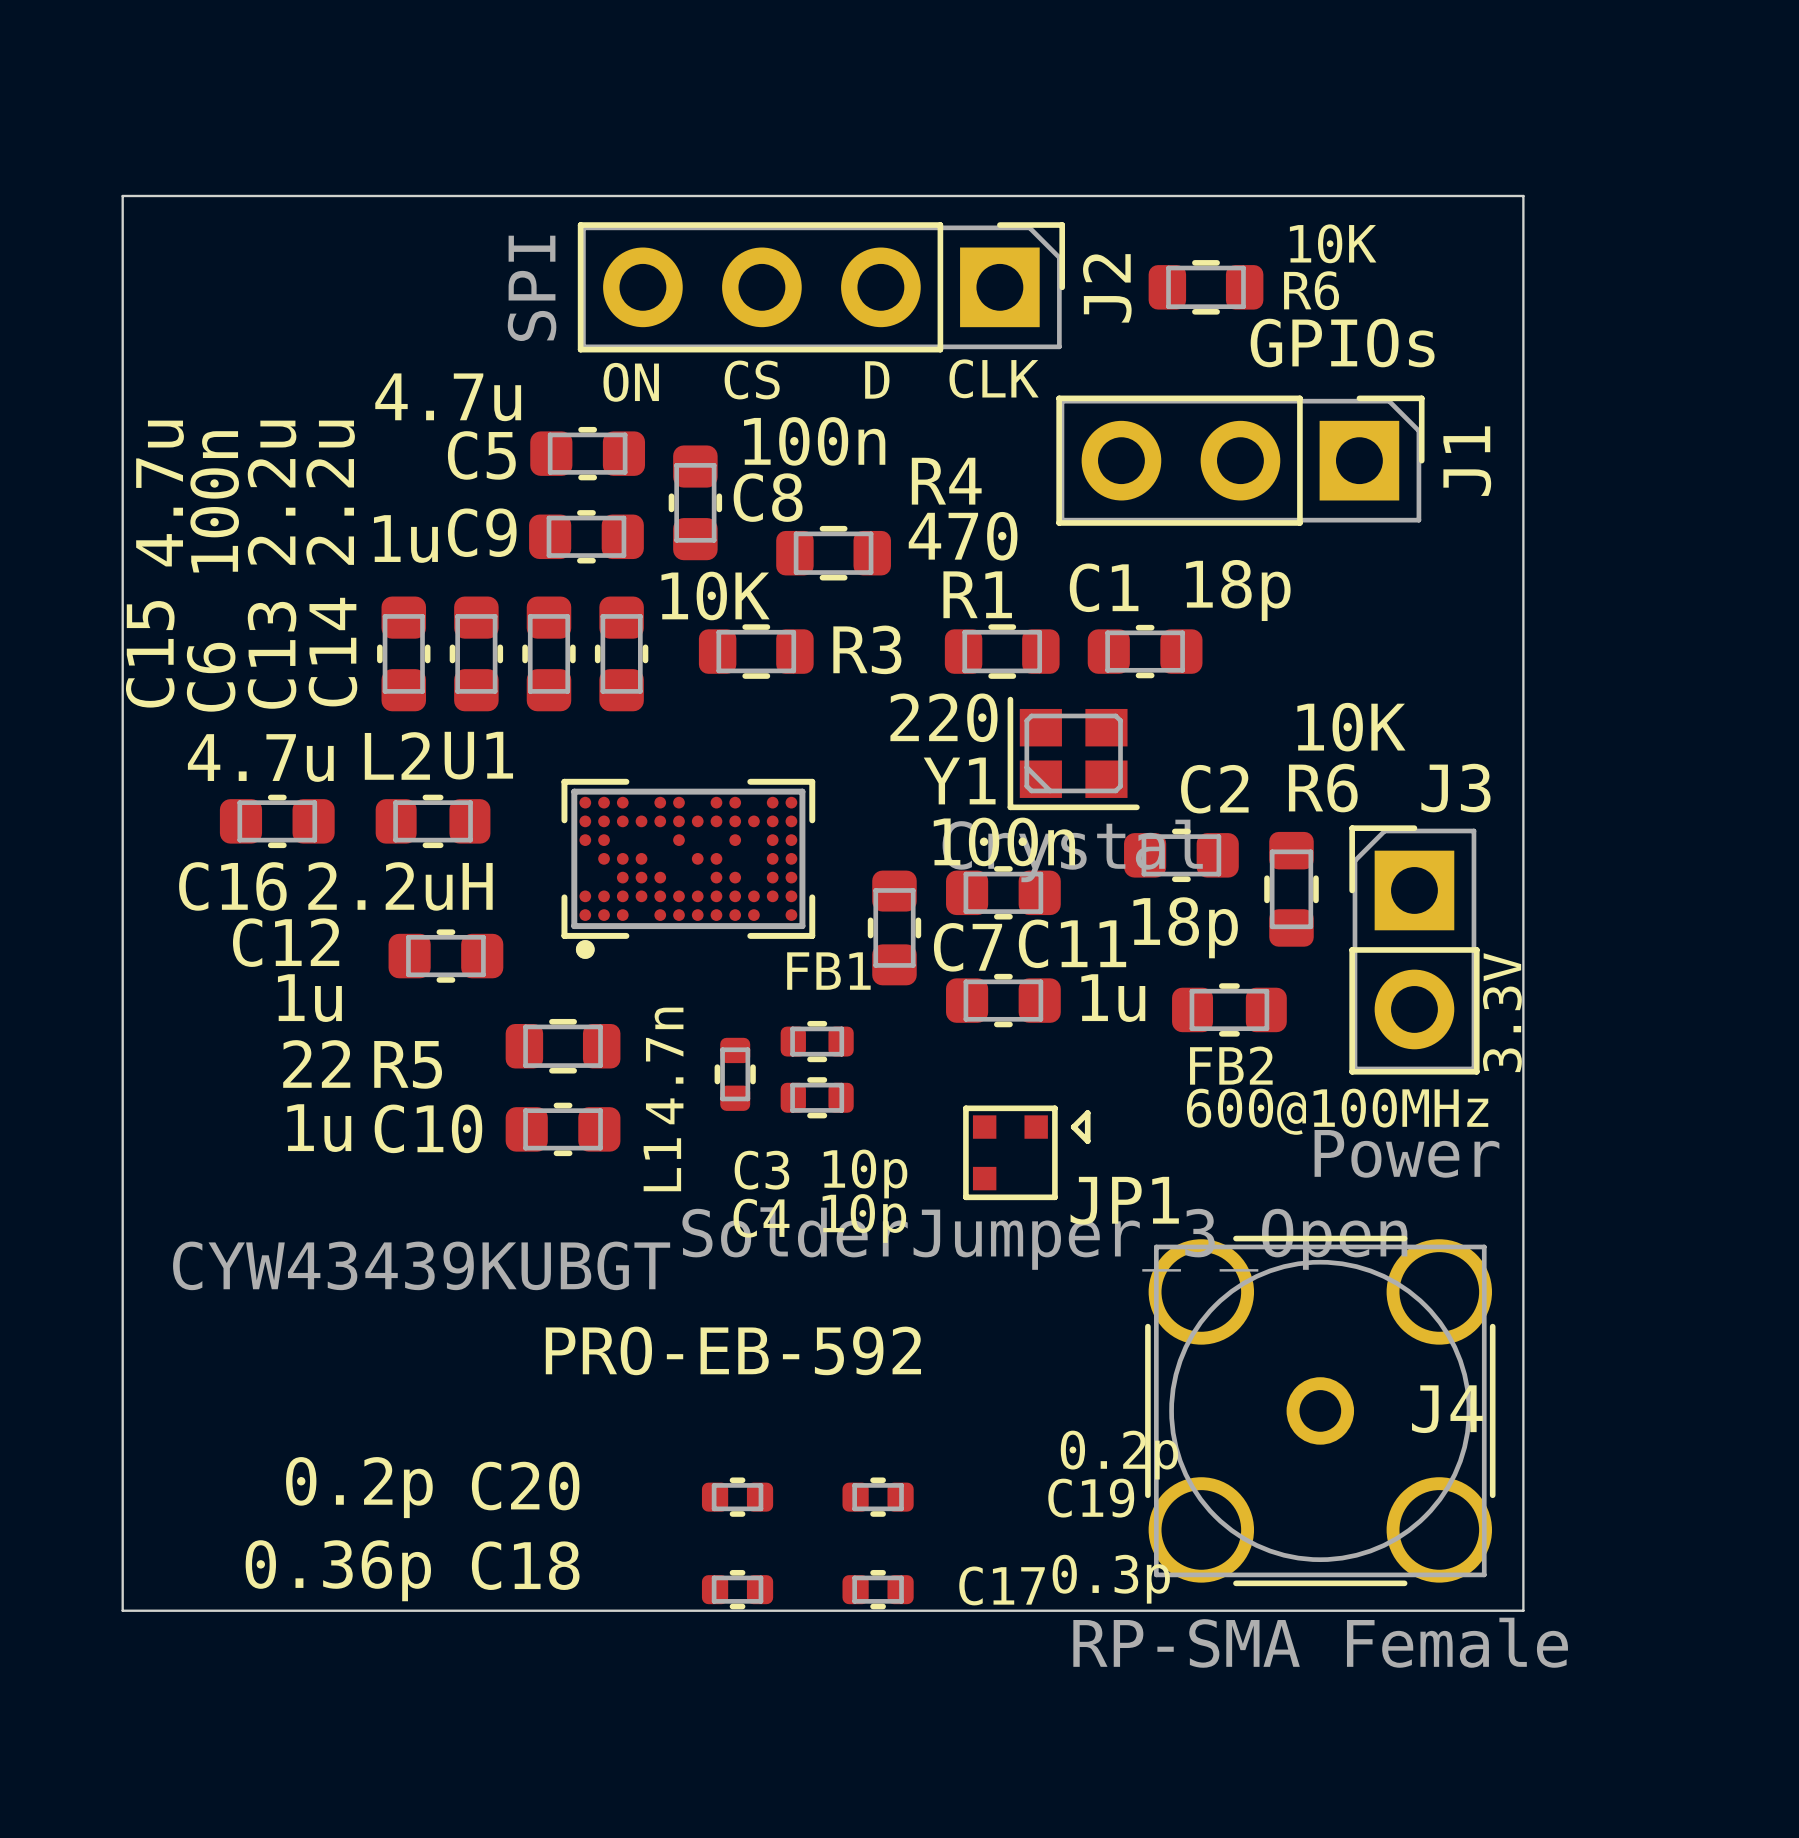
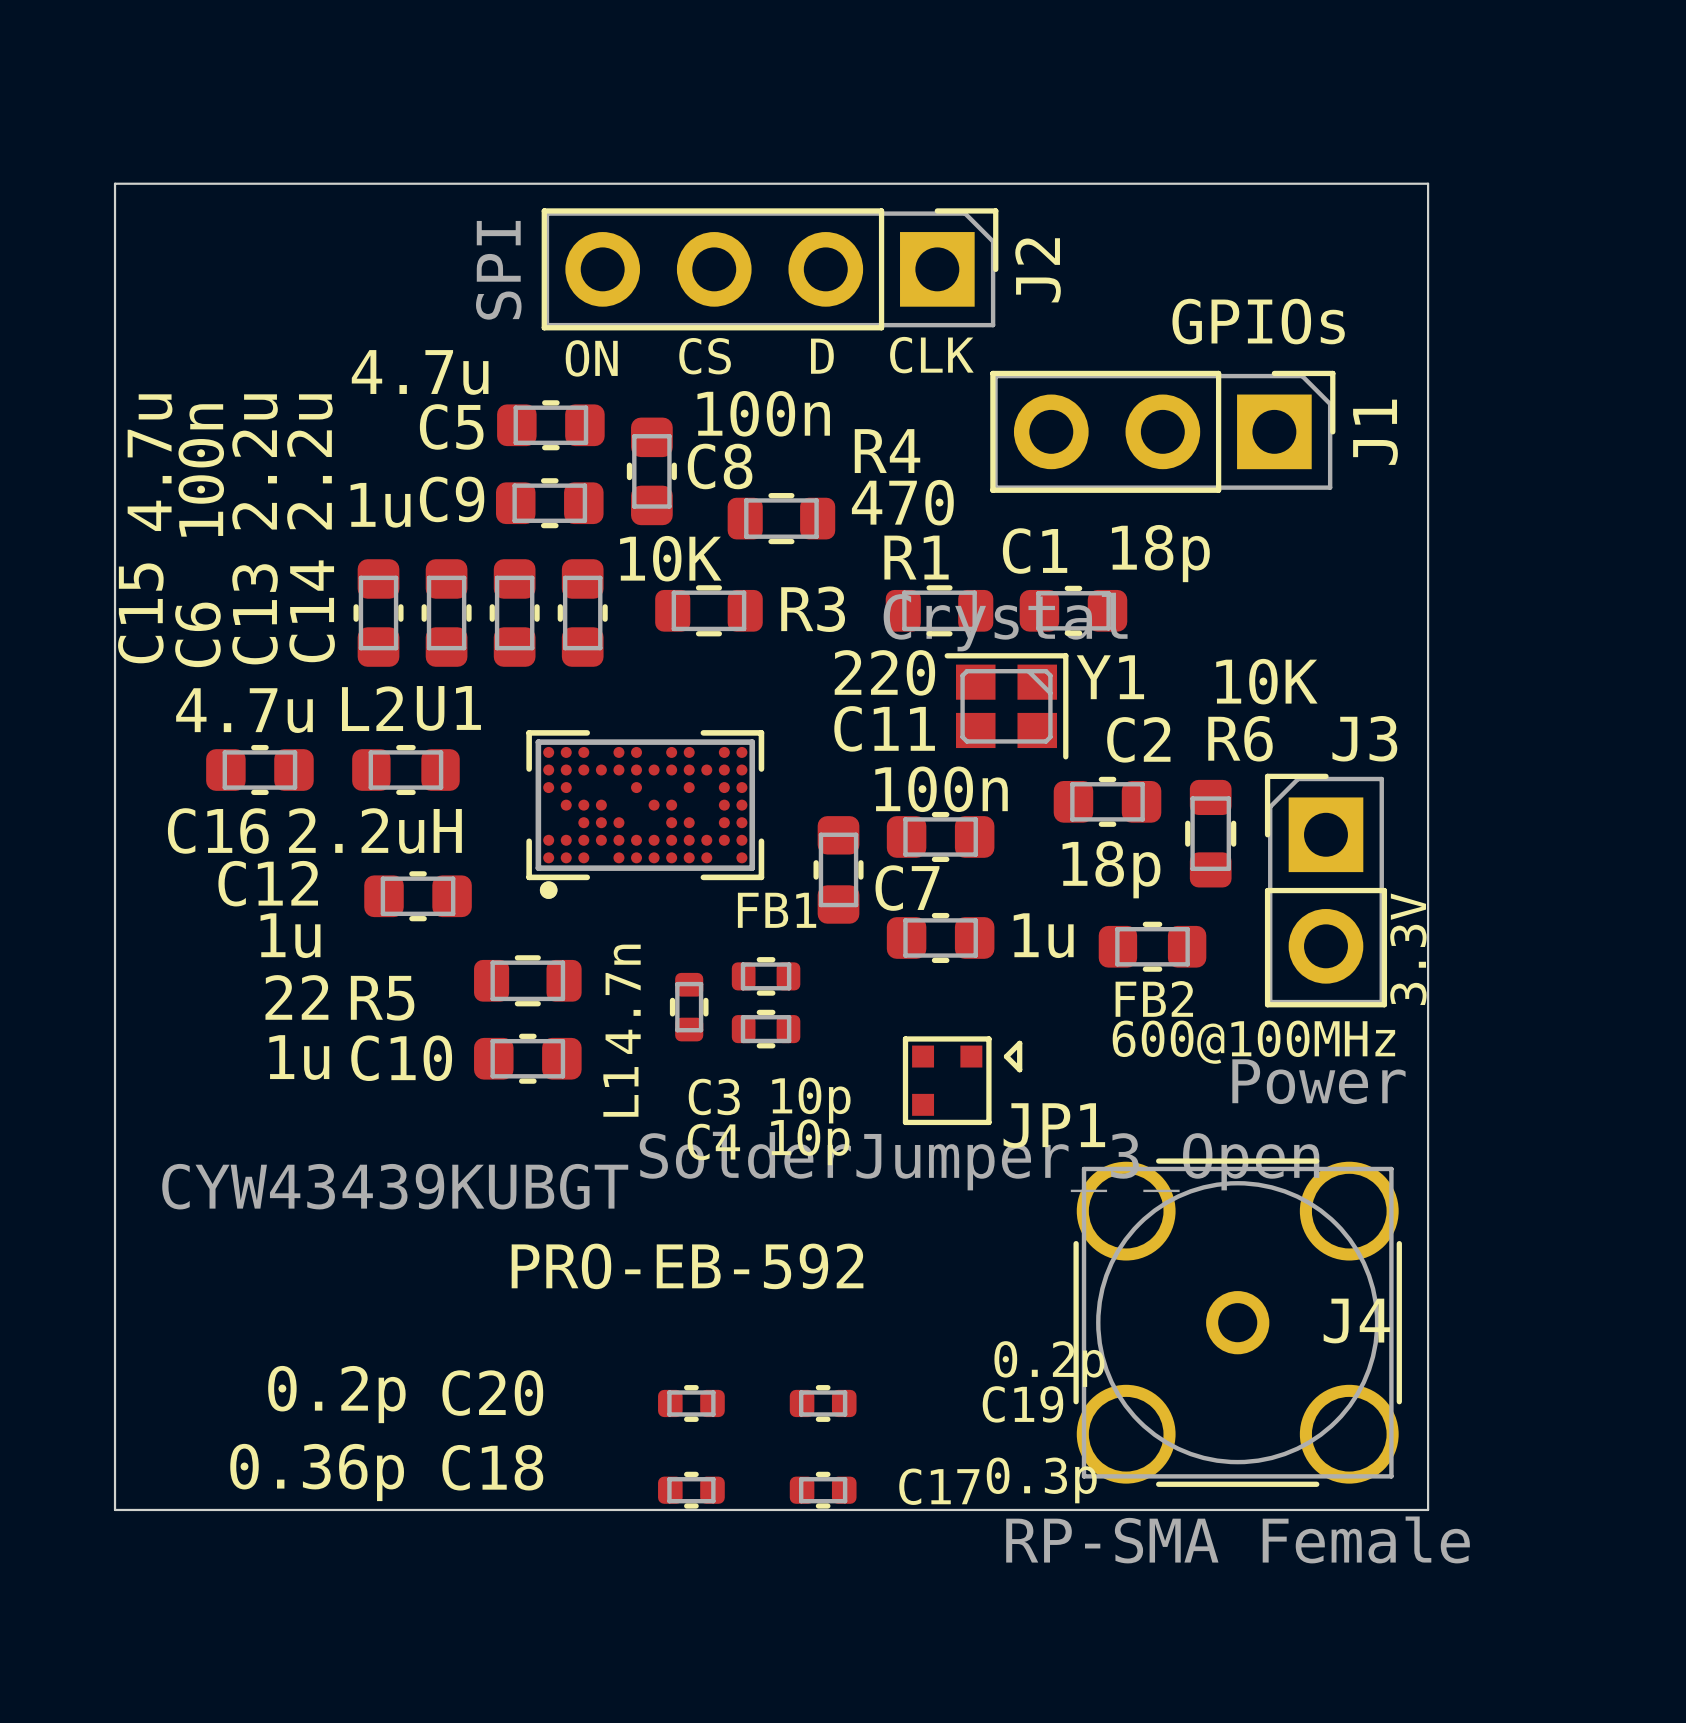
R6: 10K (1206, 287) -> none
Y1 rotation: 0° (1073, 753) -> 180° (1006, 706)
C11 name position: C11 (1072, 943) -> C11 (884, 728)

